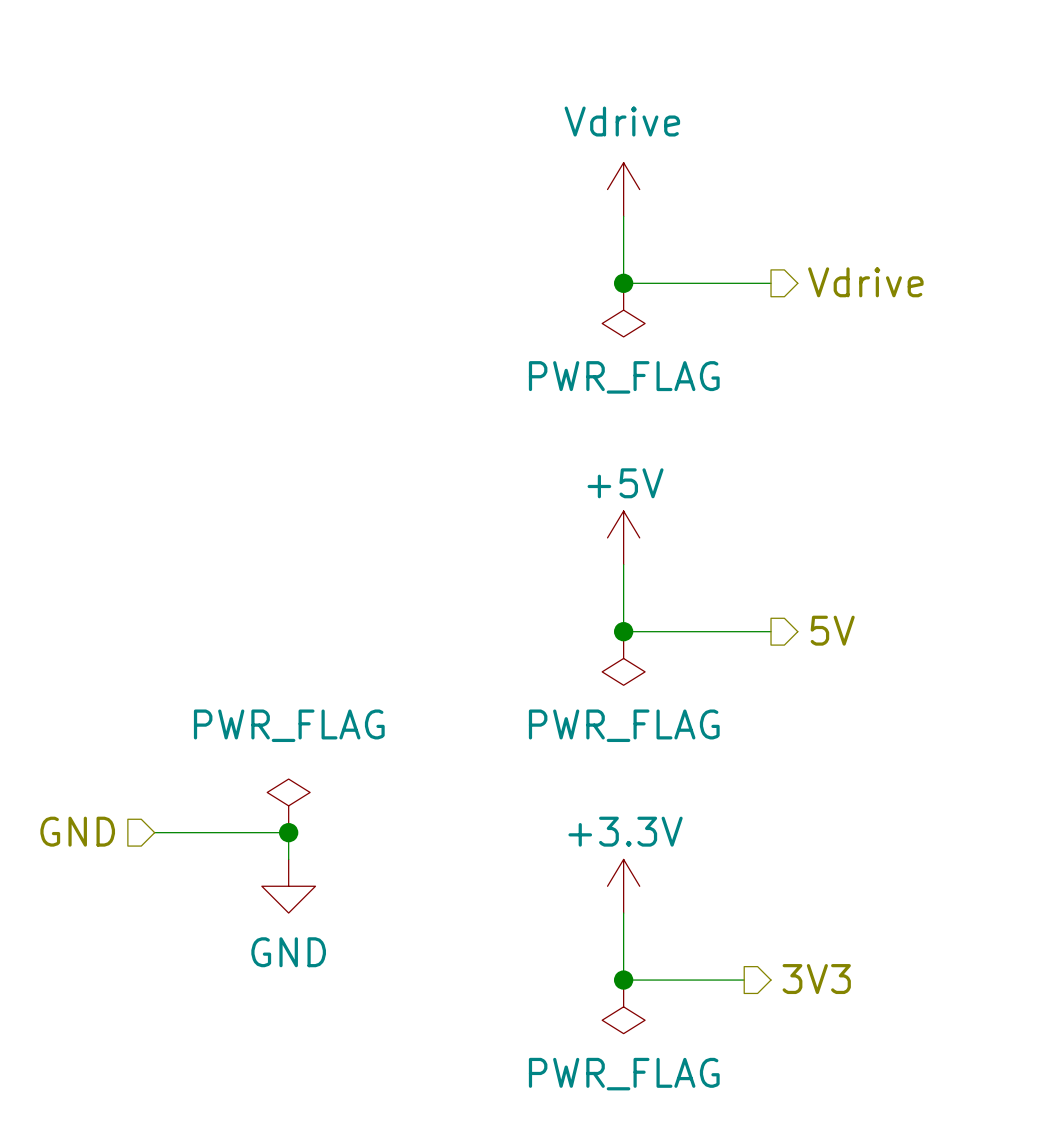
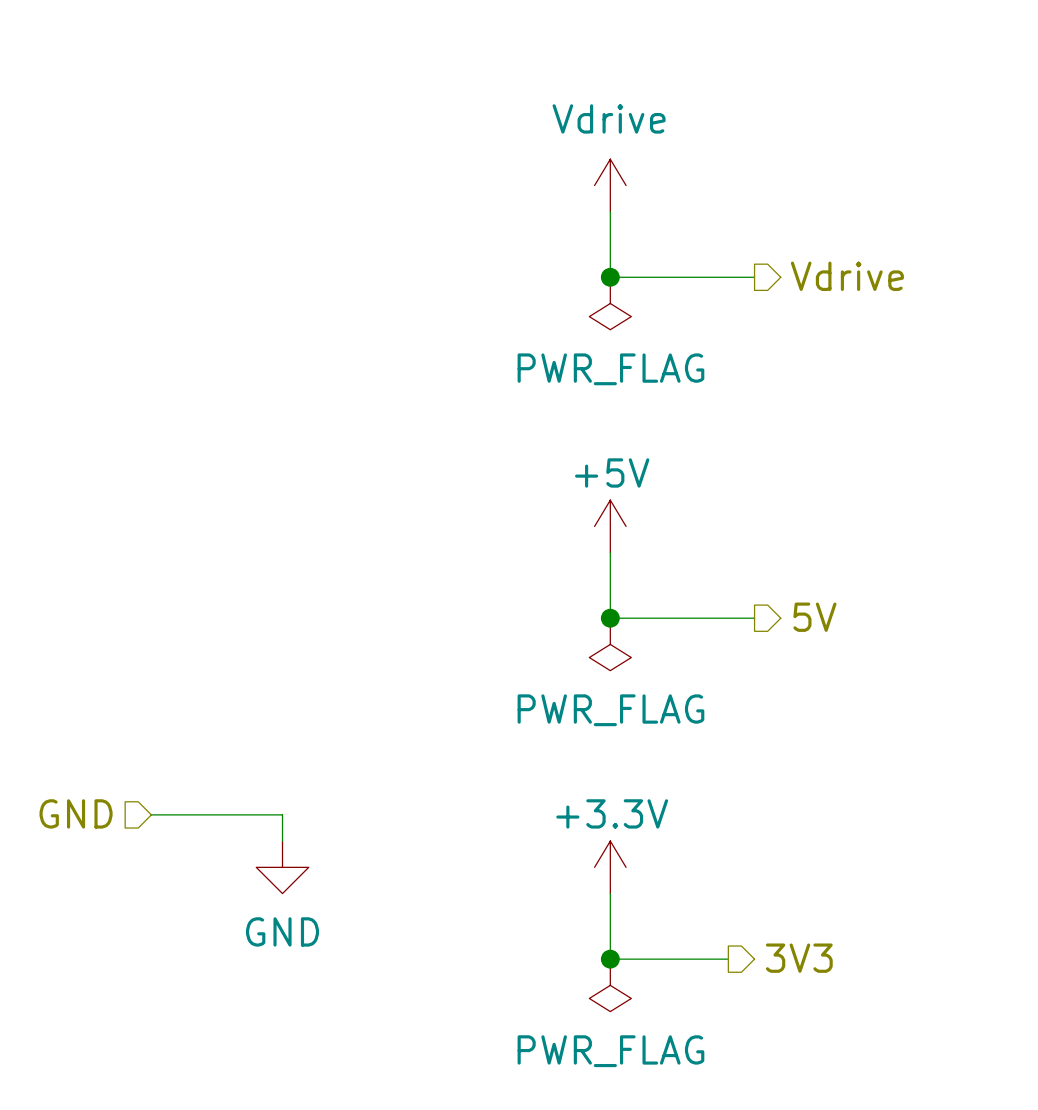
power symbol: PWR_FLAG (288, 805) -> none
junction: (288, 832) -> none

